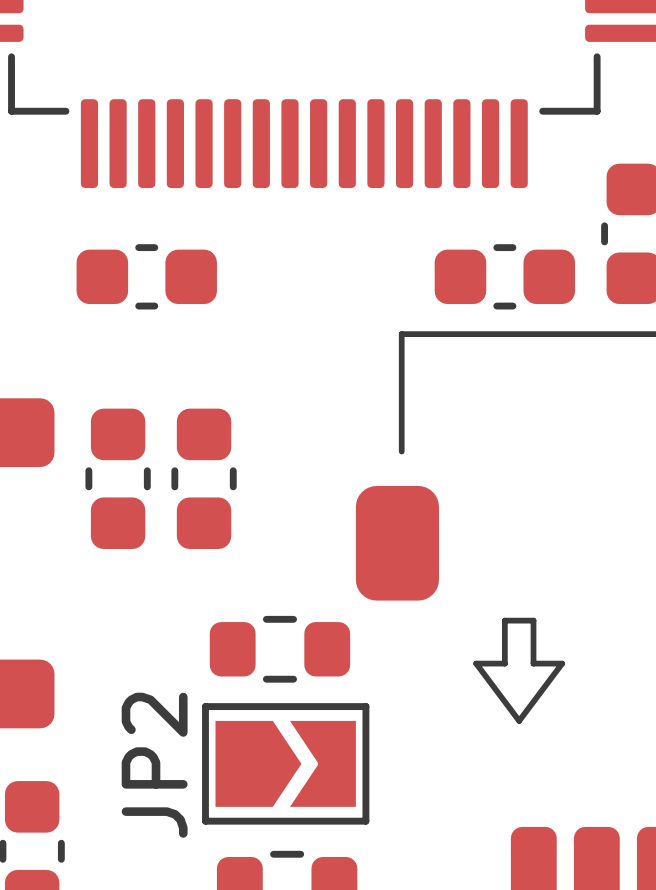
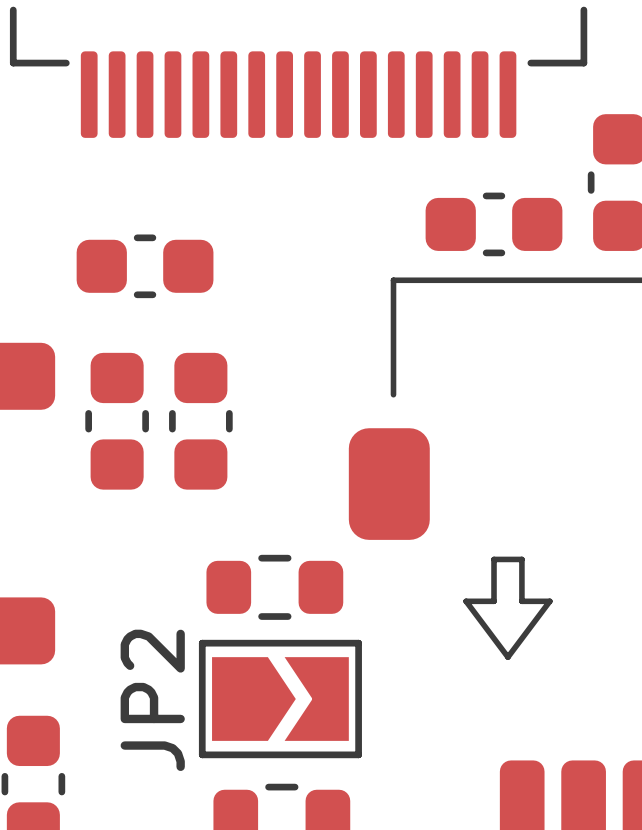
part position: (146, 276) -> (145, 266)

